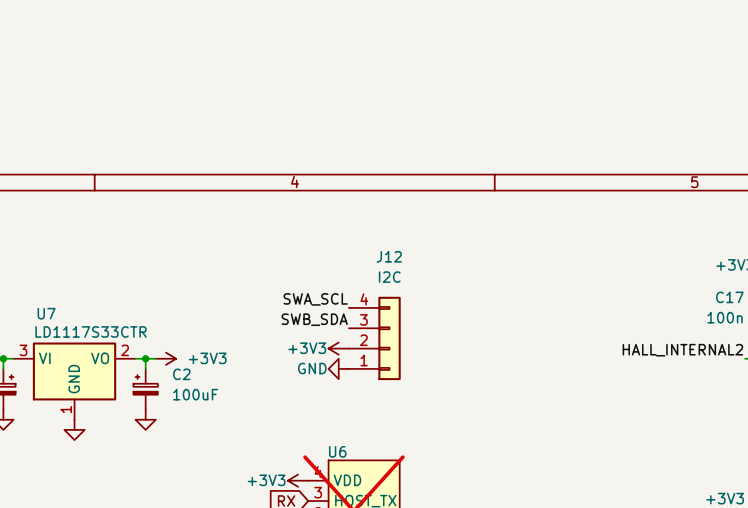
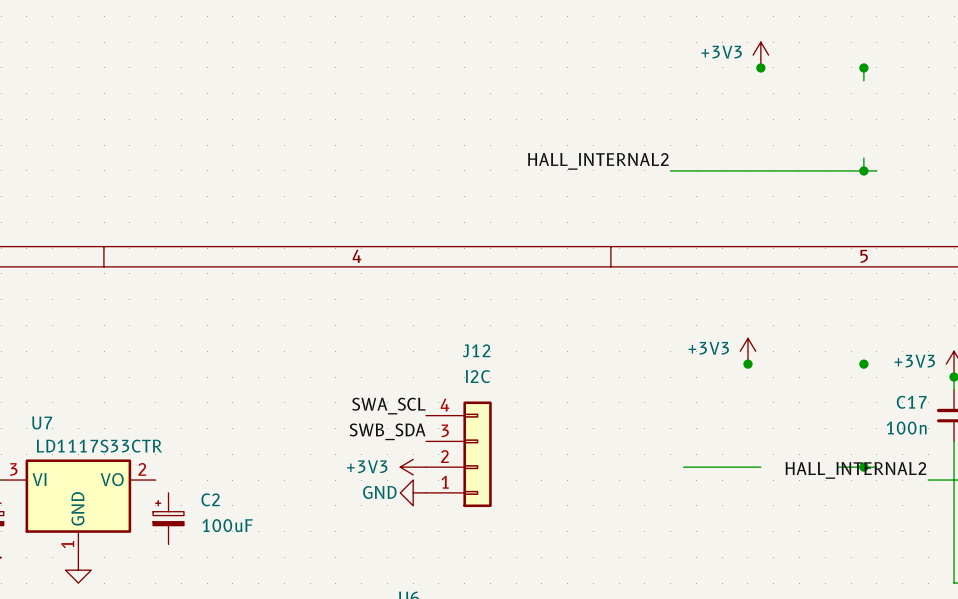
power symbol: none -> +3V3 (760, 55)
junction: none -> (760, 67)
wire: none -> (863, 67) (863, 80)
junction: none -> (863, 67)
wire: none -> (863, 158) (863, 170)
label: none -> HALL_INTERNAL2 (598, 161)
wire: none -> (670, 170) (876, 170)
junction: none -> (863, 170)
power symbol: none -> +3V3 (747, 351)
junction: none -> (747, 364)
junction: none -> (863, 364)
wire: none -> (683, 467) (760, 467)
wire: none -> (838, 467) (876, 467)
junction: none -> (863, 467)
wire: (135, 358) (155, 358) -> none
wire: (145, 358) (145, 368) -> none
junction: (145, 358) -> none
power symbol: +3V3 (165, 358) -> none
power symbol: (145, 419) -> none

